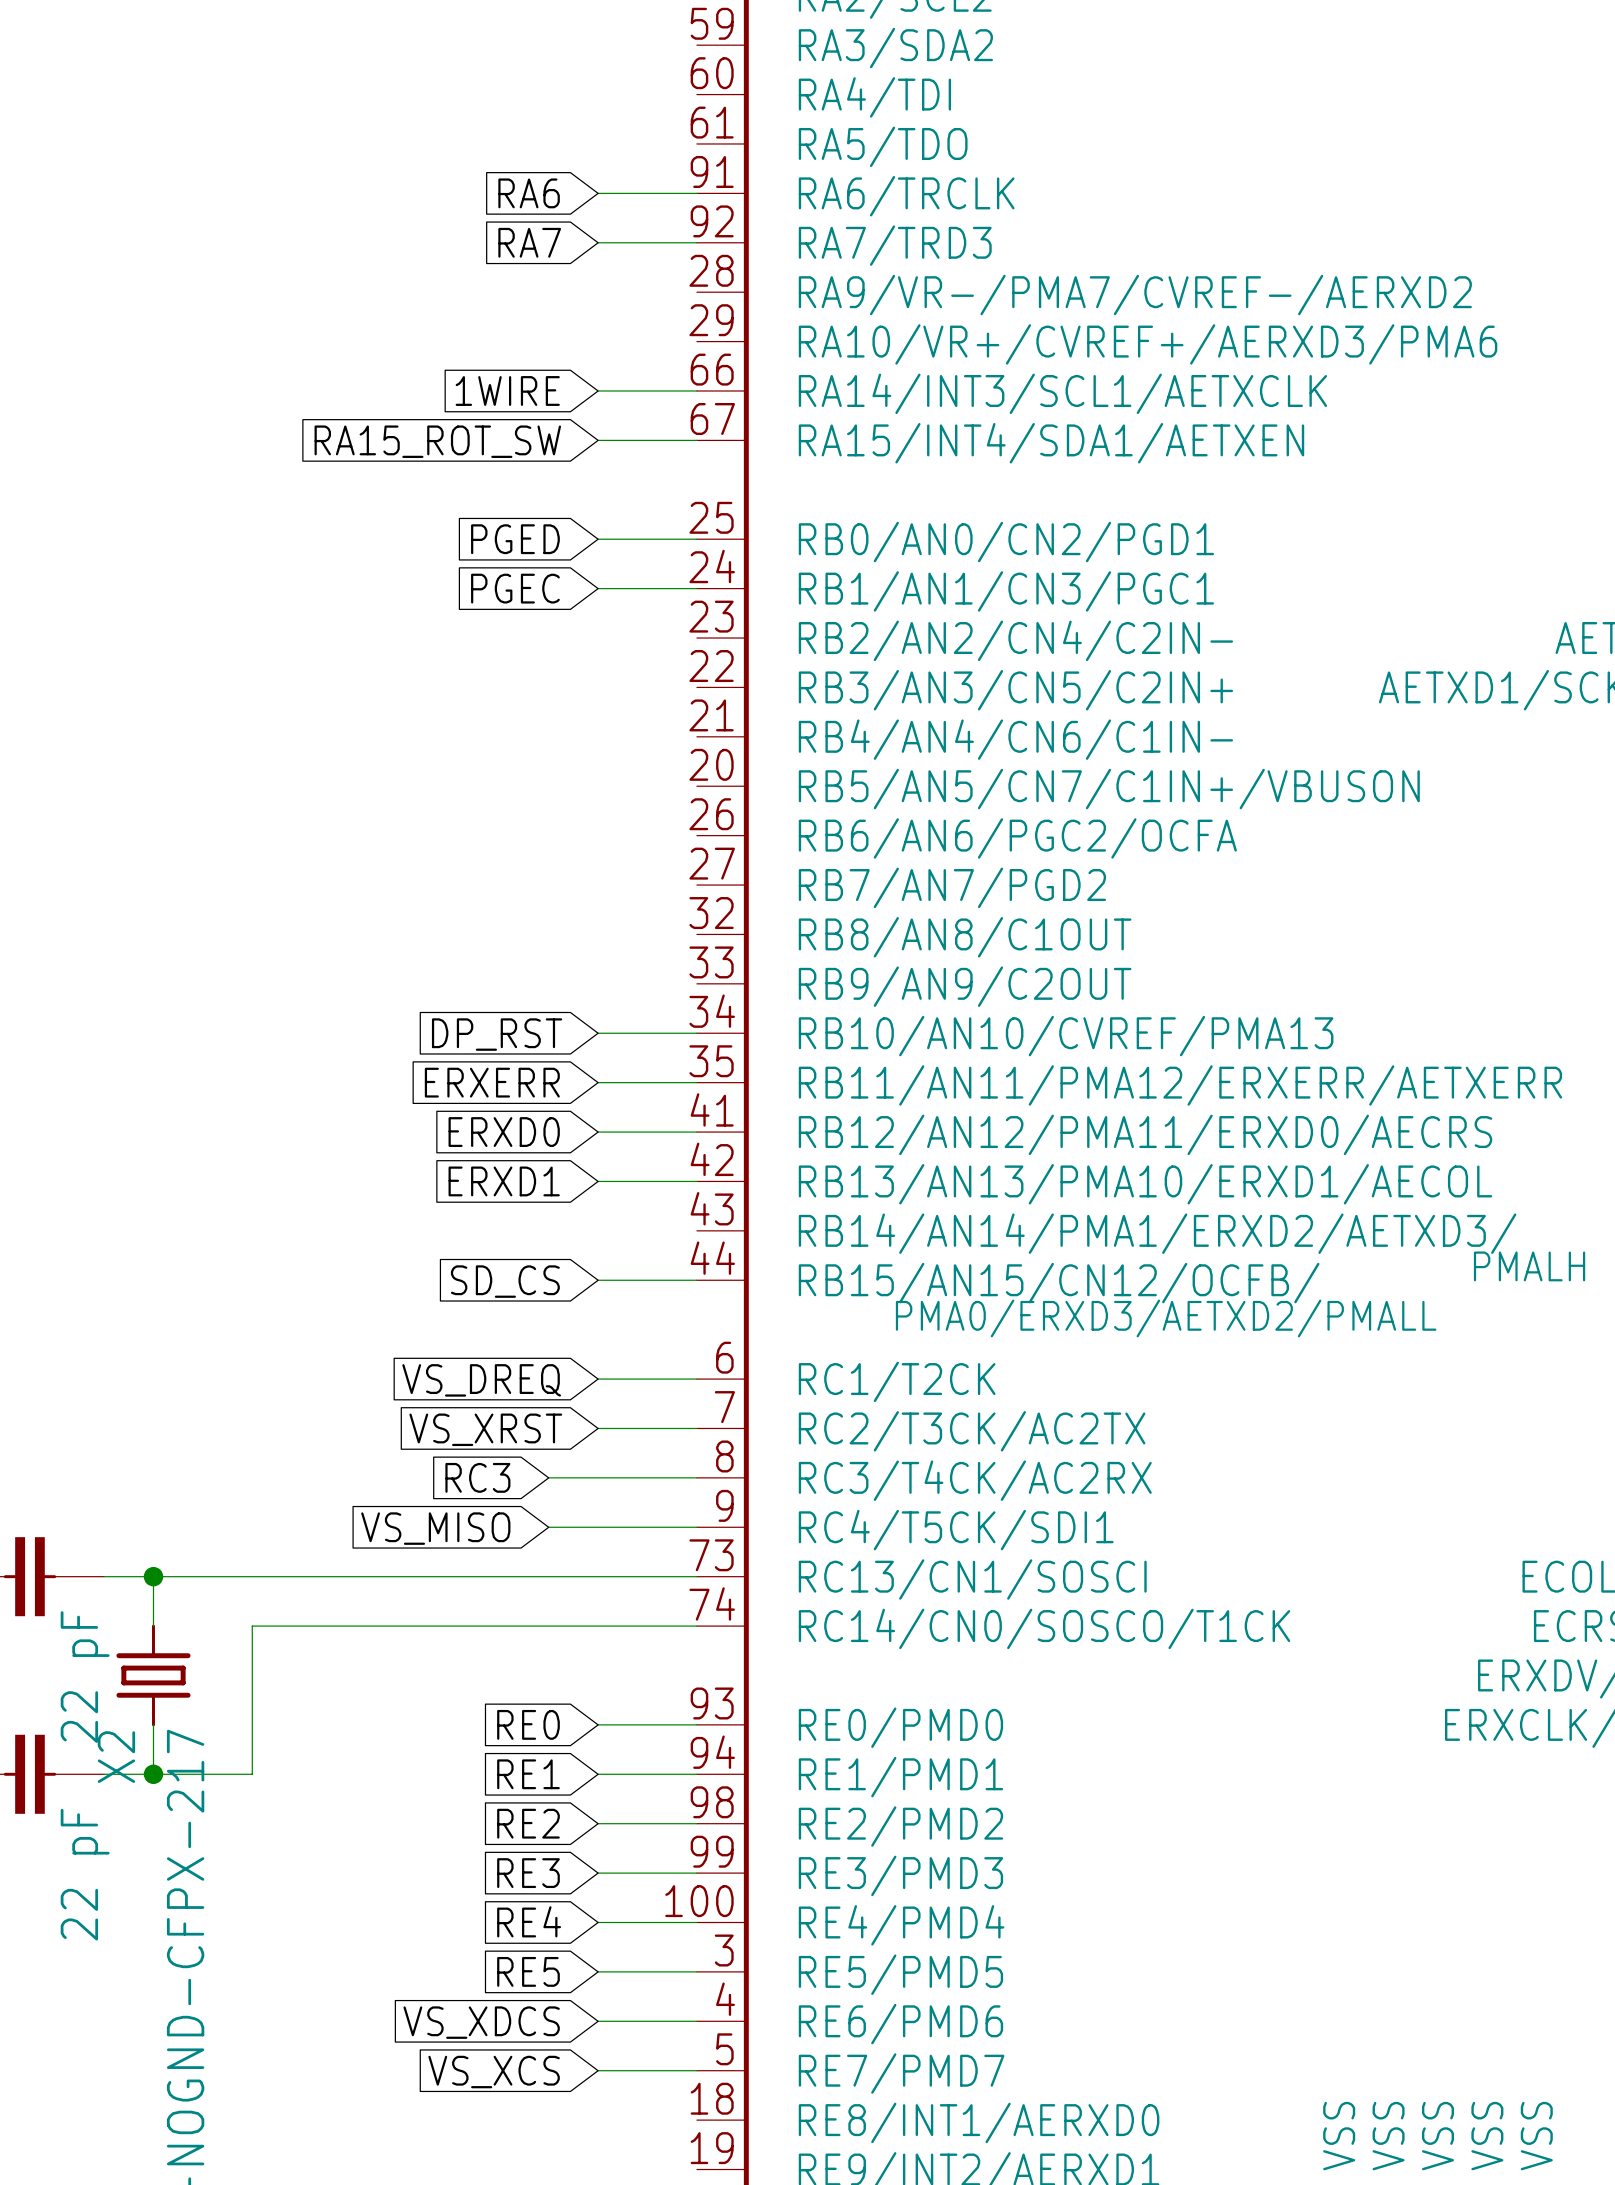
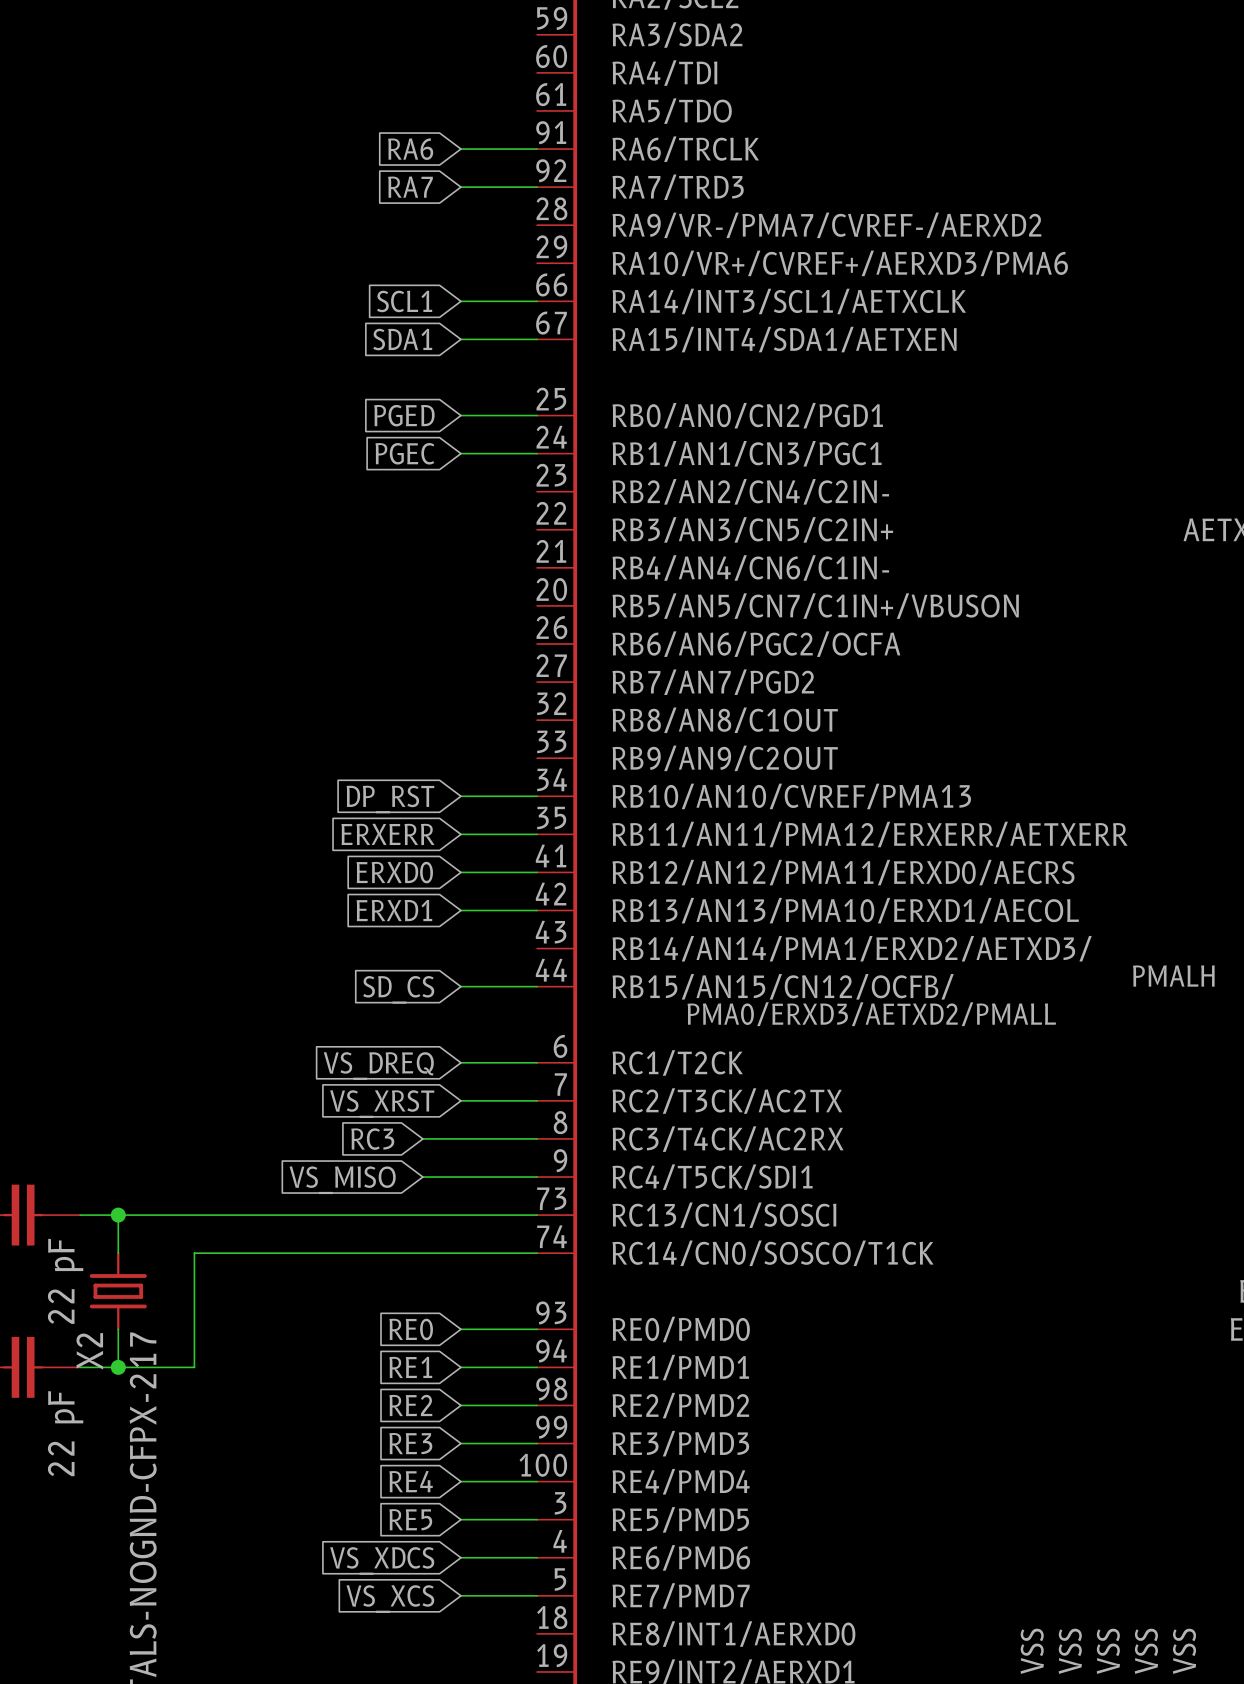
global label: 1WIRE (507, 391) -> SCL1 (404, 301)
global label: RA15_ROT_SW (437, 441) -> SDA1 (402, 339)

